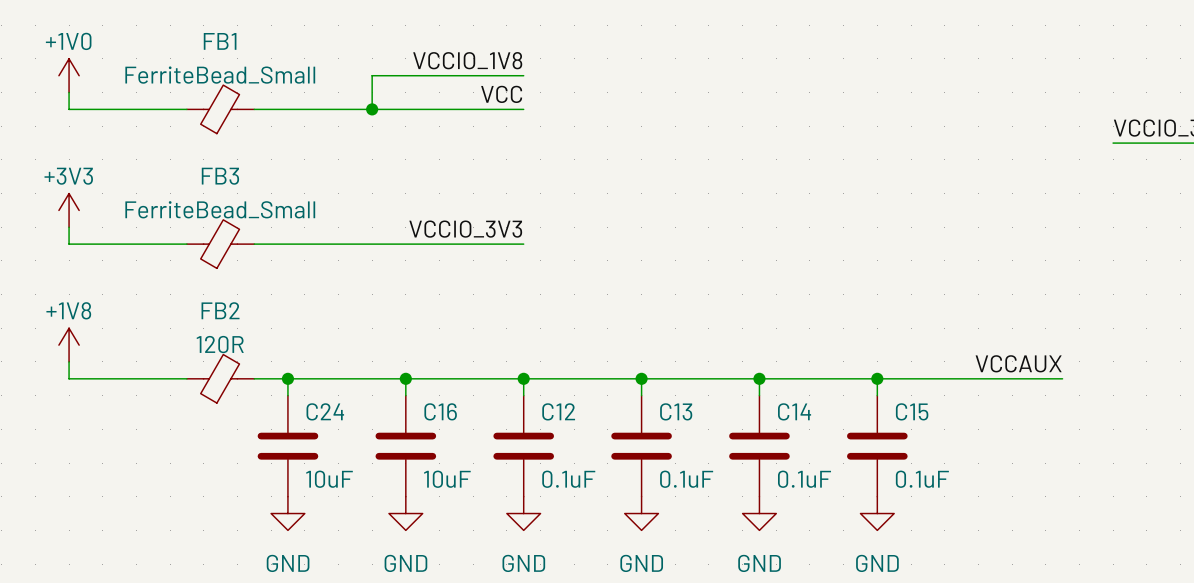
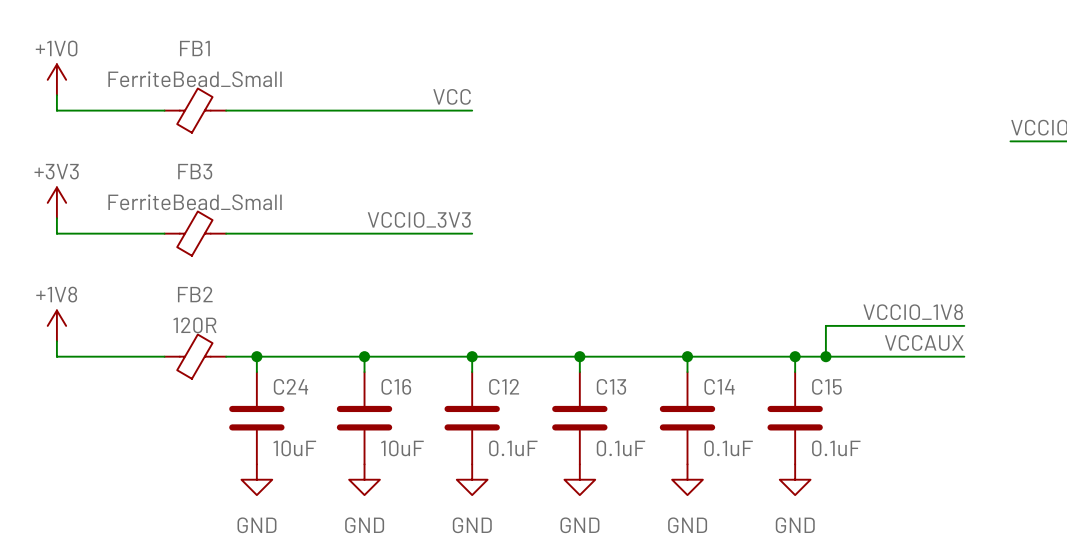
label: VCCIO_1V8 (467, 60) -> none
wire: (523, 75) (372, 75) (372, 109) -> none
junction: (372, 109) -> none
label: none -> VCCIO_1V8 (913, 312)
wire: none -> (964, 325) (825, 325) (825, 356)
junction: none -> (825, 356)

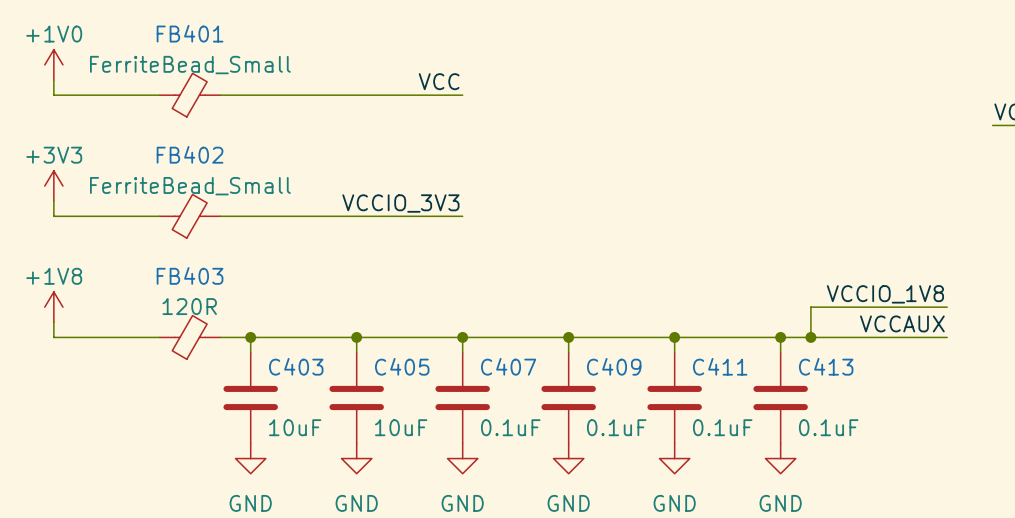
FB1 name: FB1 (194, 48) -> FB401 (190, 33)
FB3 name: FB3 (195, 171) -> FB402 (190, 154)
FB2 name: FB2 (195, 294) -> FB403 (190, 275)
C24 name: C24 (290, 386) -> C403 (296, 366)
C16 name: C16 (396, 386) -> C405 (402, 366)
C12 name: C12 (504, 386) -> C407 (508, 366)
C13 name: C13 (611, 386) -> C409 (614, 366)
C14 name: C14 (719, 386) -> C411 (720, 366)
C15 name: C15 (826, 386) -> C413 (826, 366)

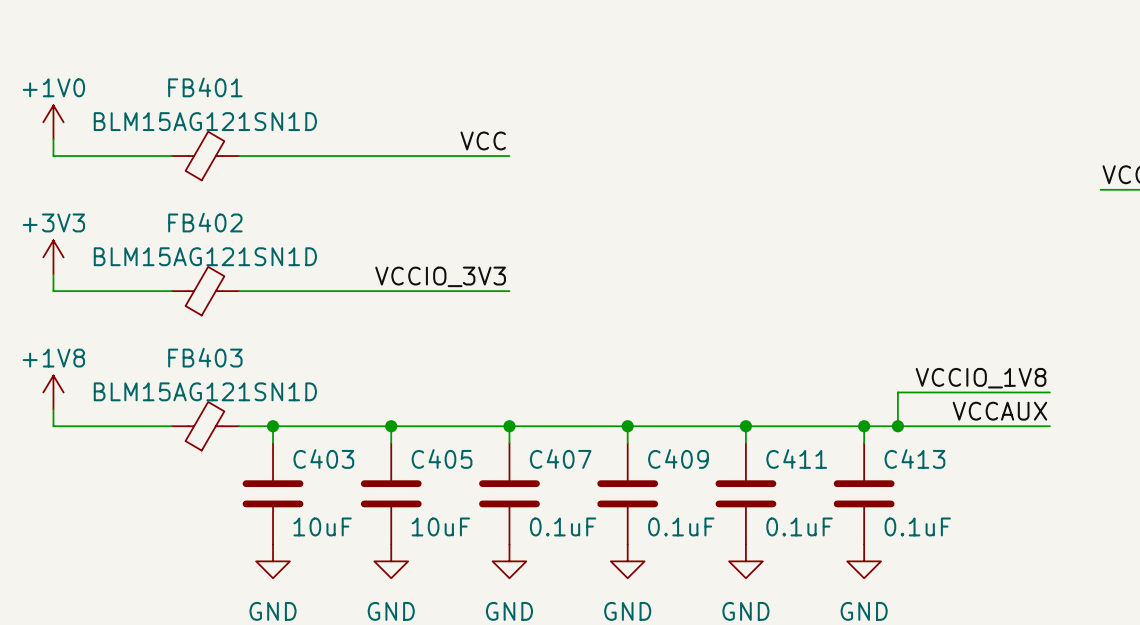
FB401 value: FerriteBead_Small (190, 65) -> BLM15AG121SN1D (205, 121)
FB402 value: FerriteBead_Small (190, 186) -> BLM15AG121SN1D (205, 256)
FB403 value: 120R (189, 306) -> BLM15AG121SN1D (205, 391)

